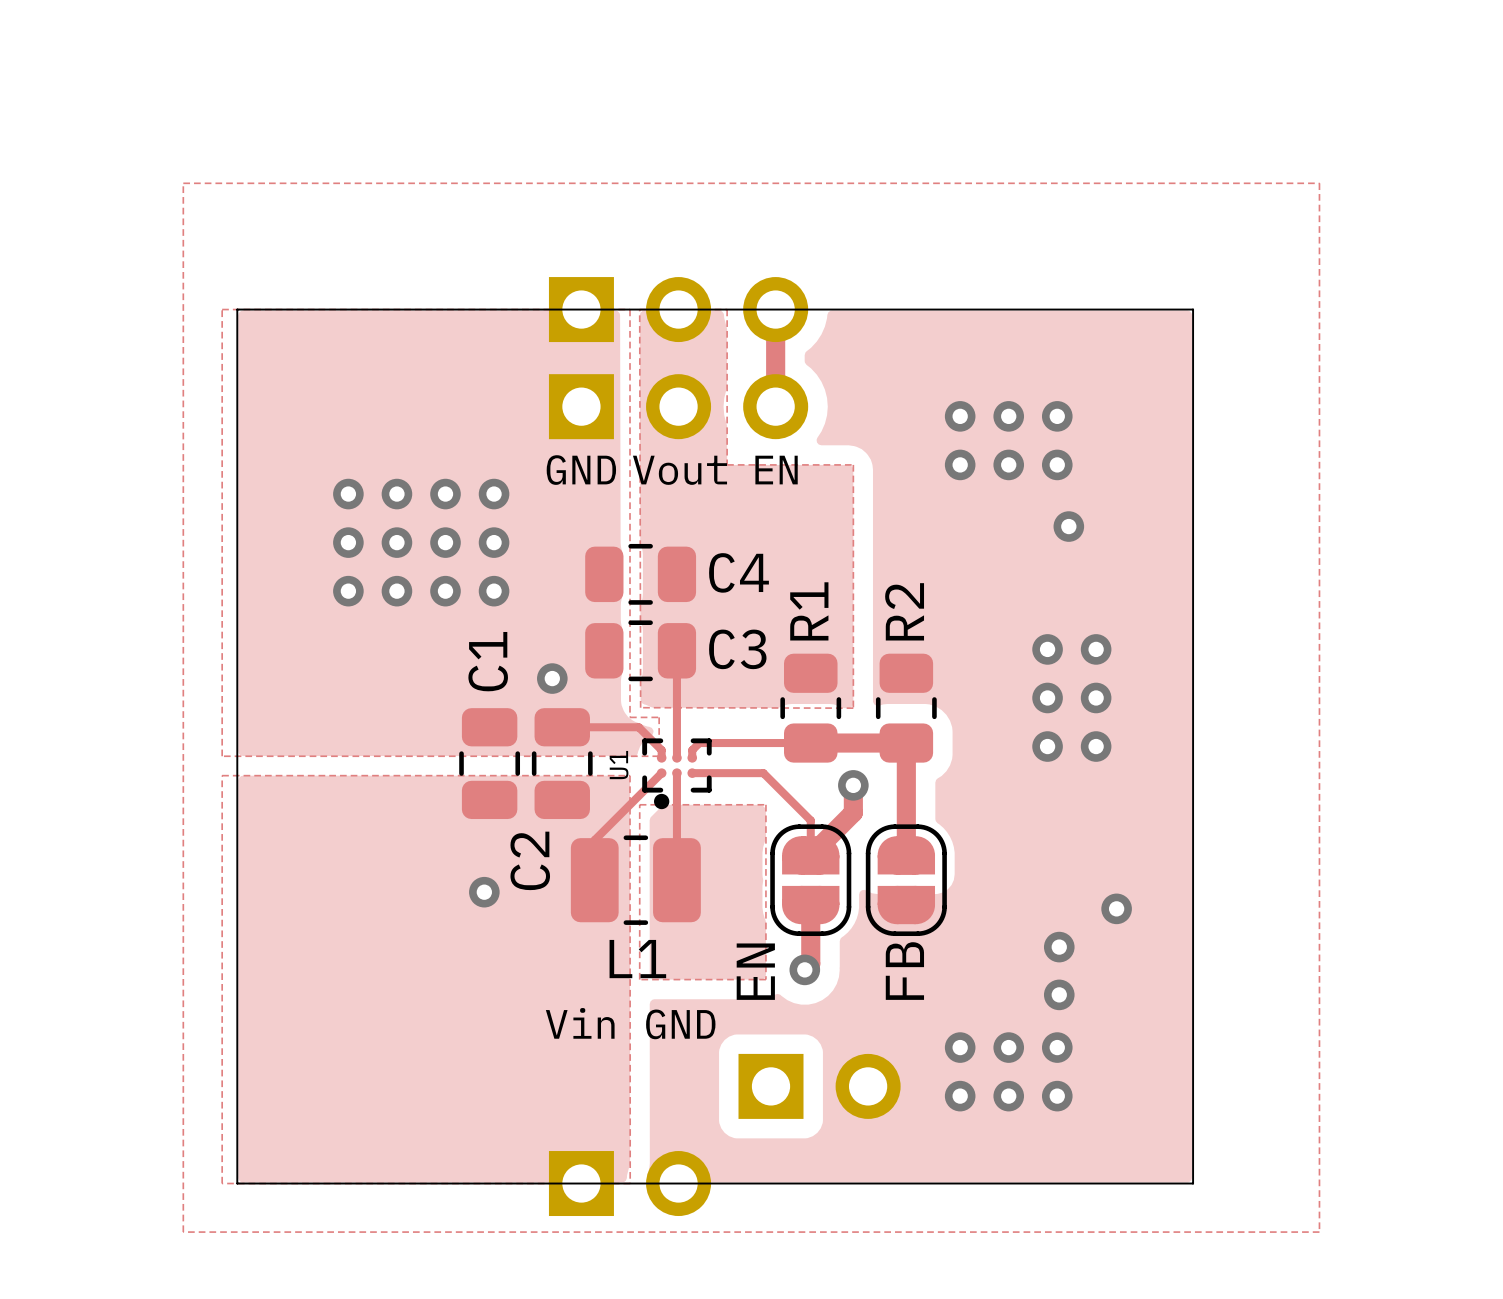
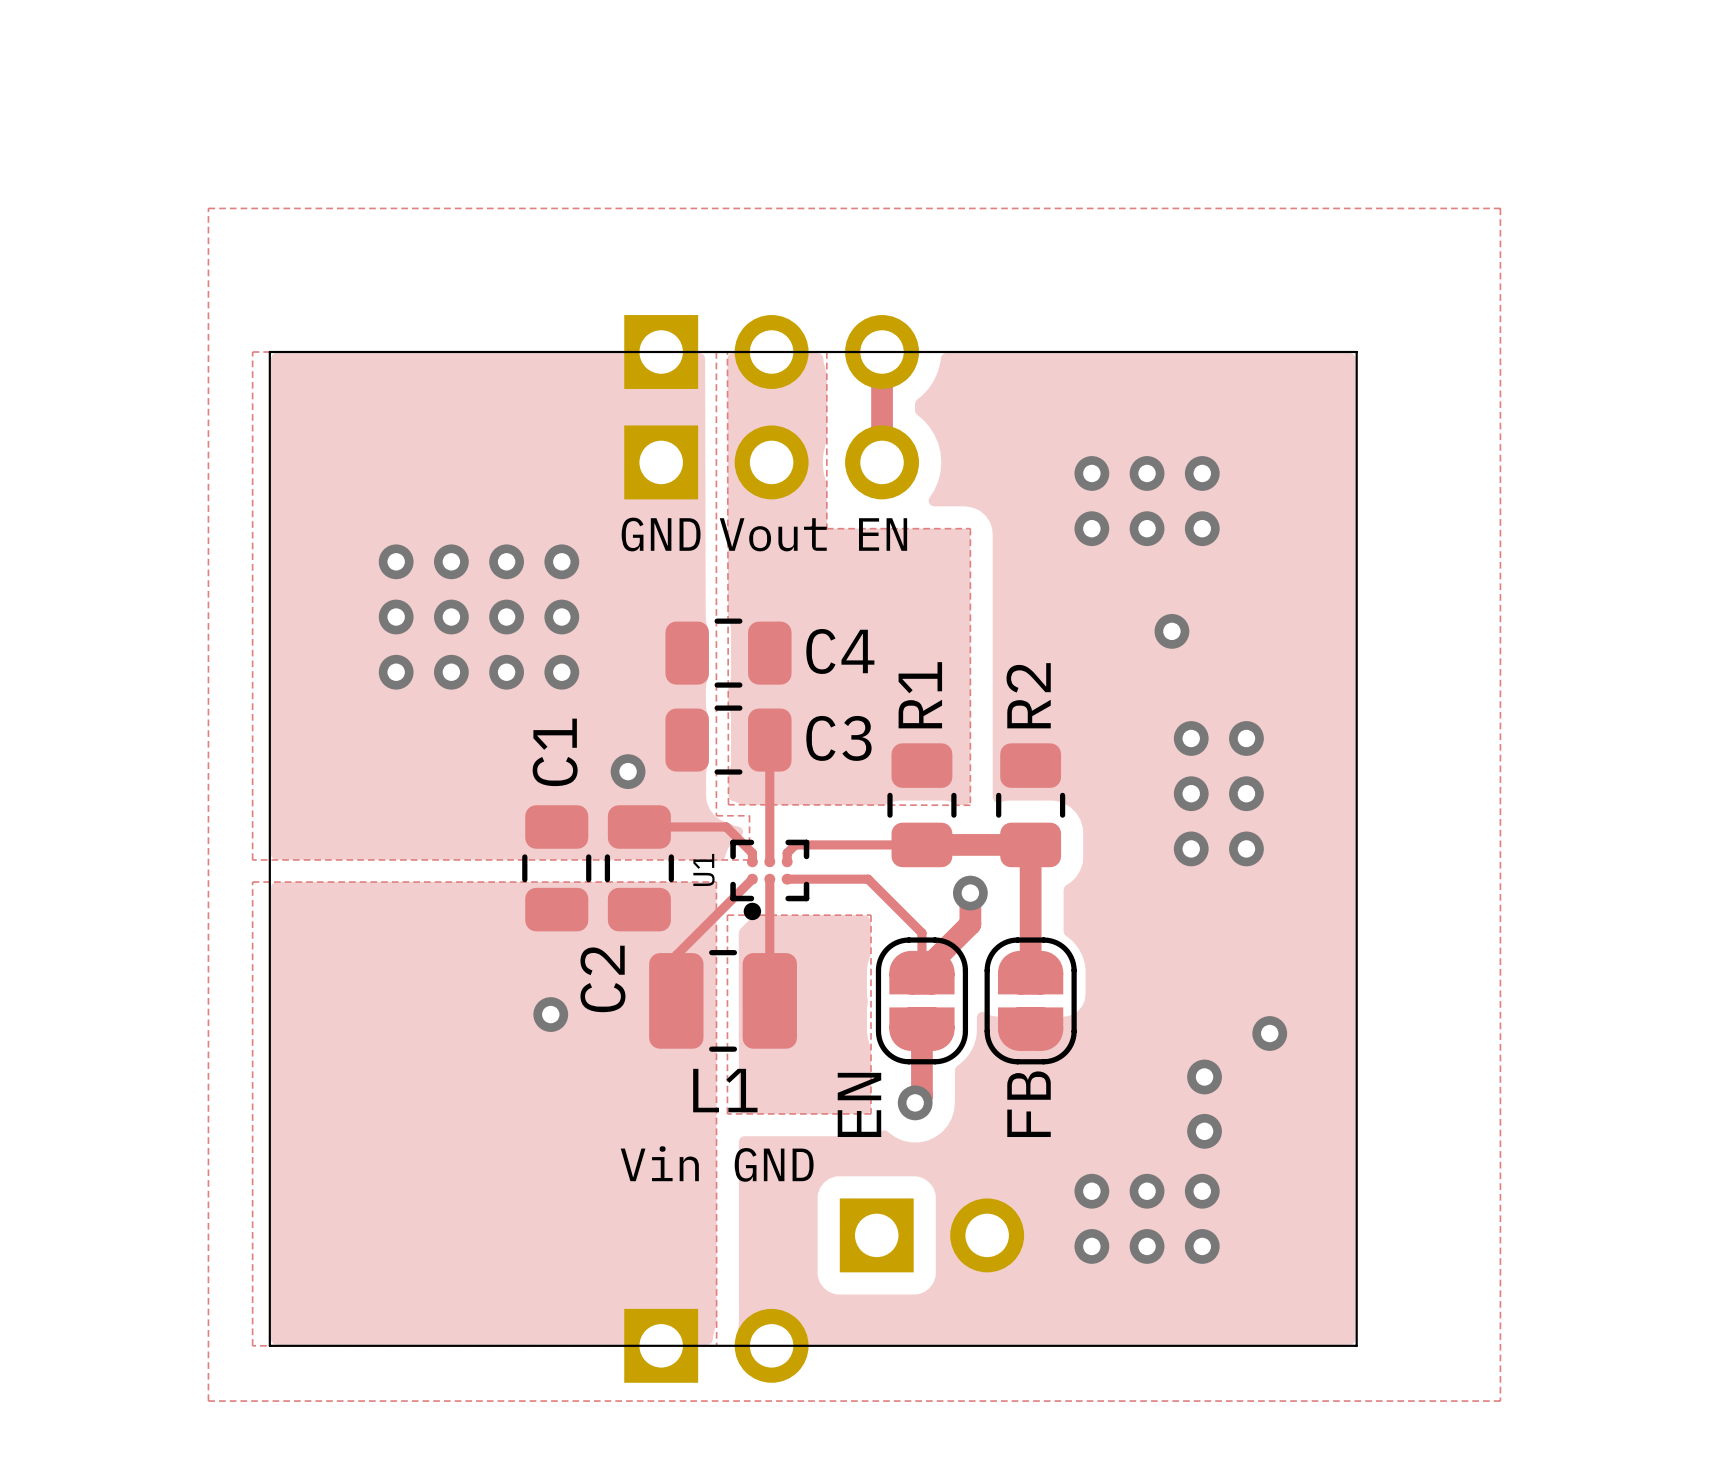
via position: (1068, 526) -> (1171, 631)

